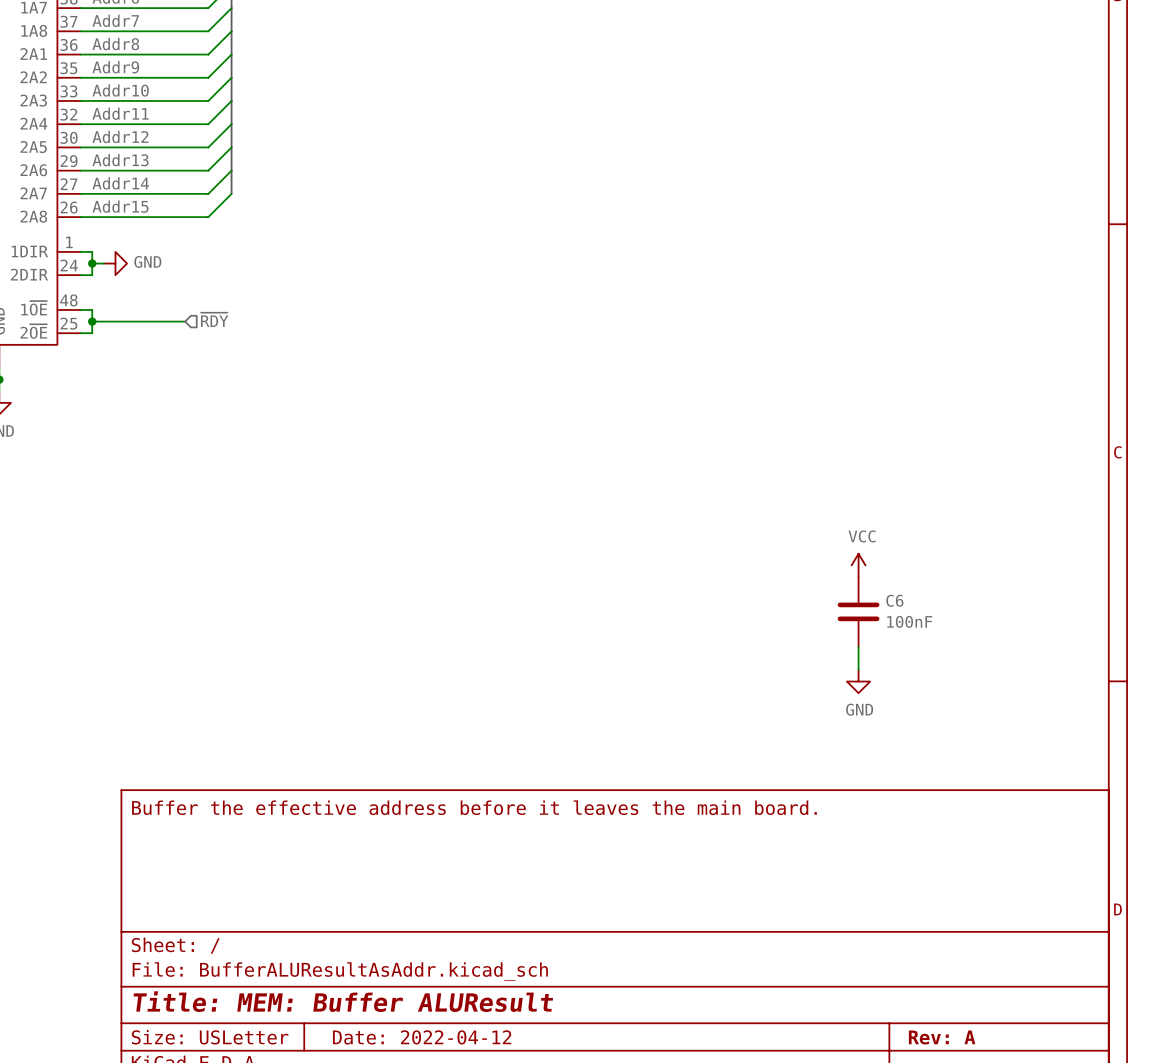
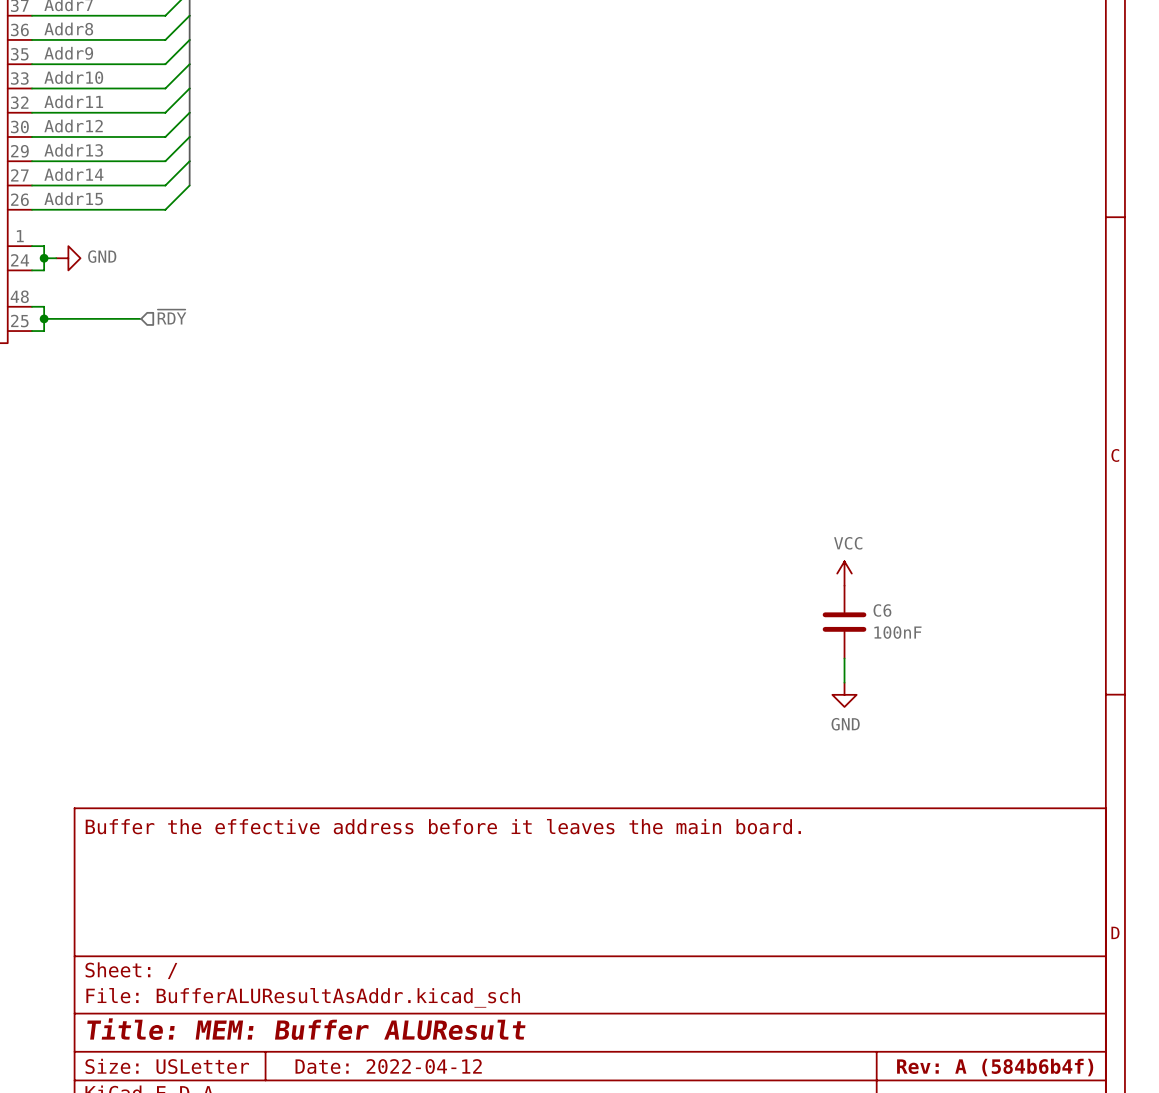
title block: Rev: A (942, 1037) -> Rev: A (584b6b4f) (995, 1067)

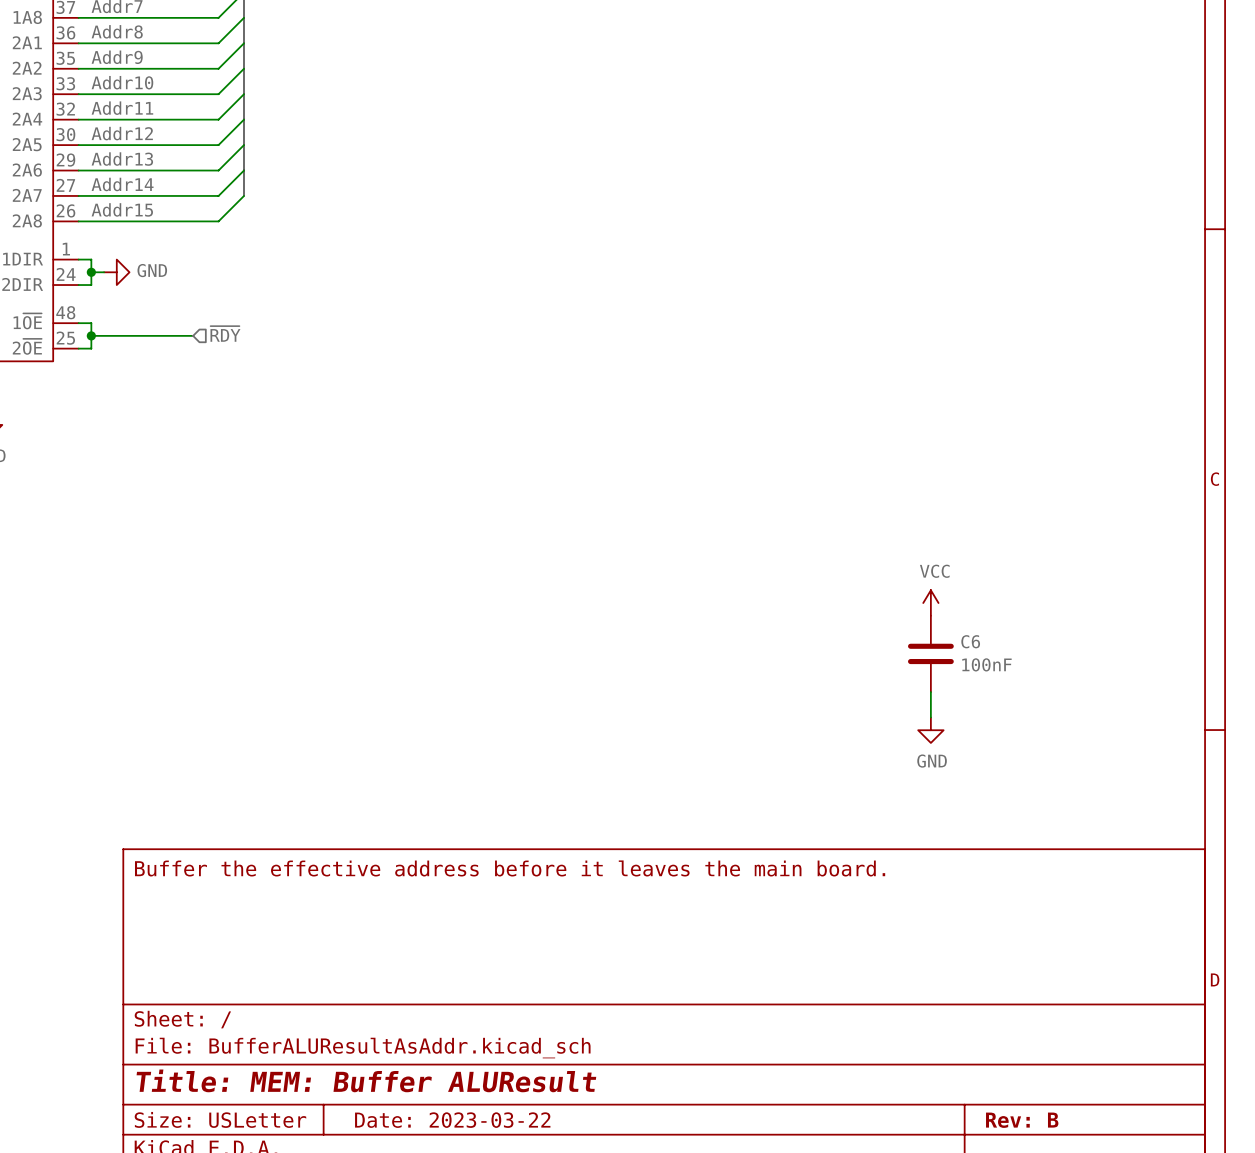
title block: Date: 2022-04-12 (388, 1066) -> Date: 2023-03-22 (452, 1120)
title block: Rev: A (584b6b4f) (995, 1067) -> Rev: B (1022, 1120)

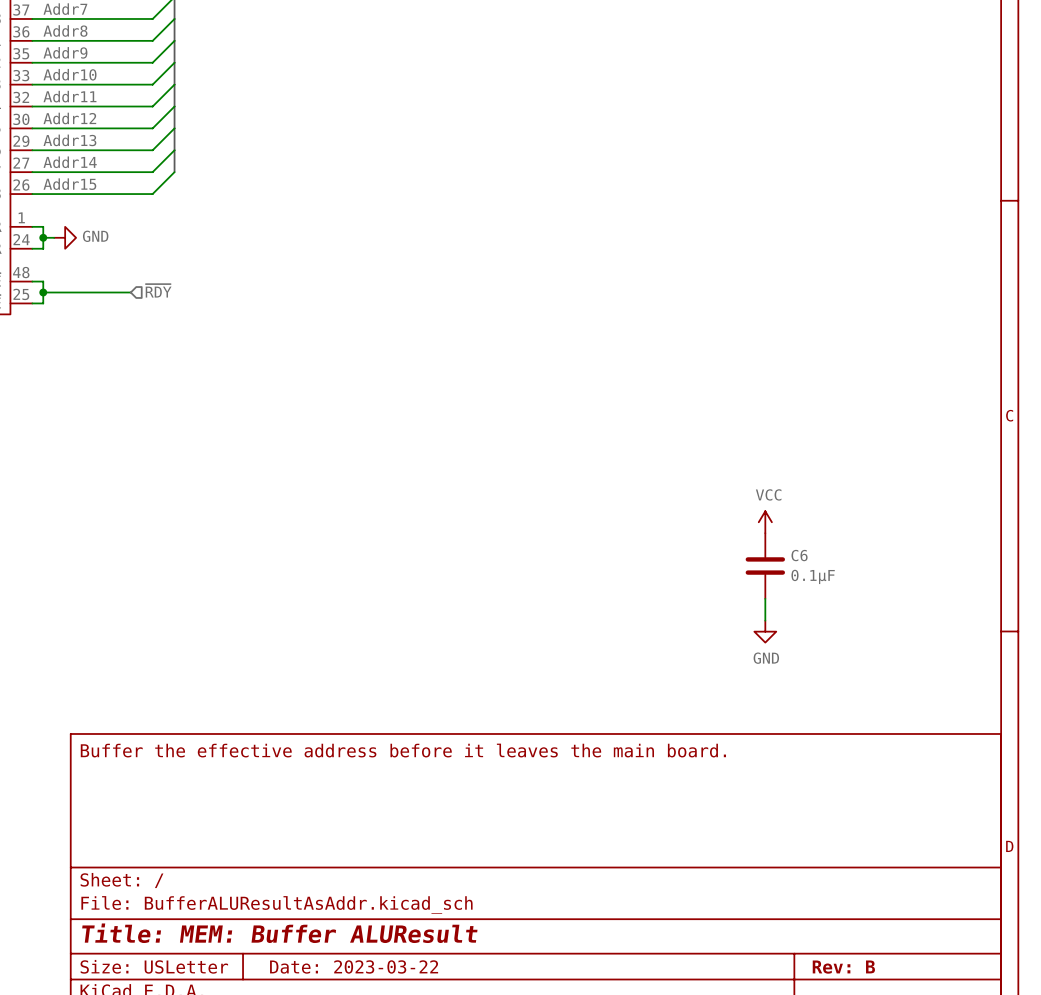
C6 value: 100nF (986, 664) -> 0.1μF (813, 576)

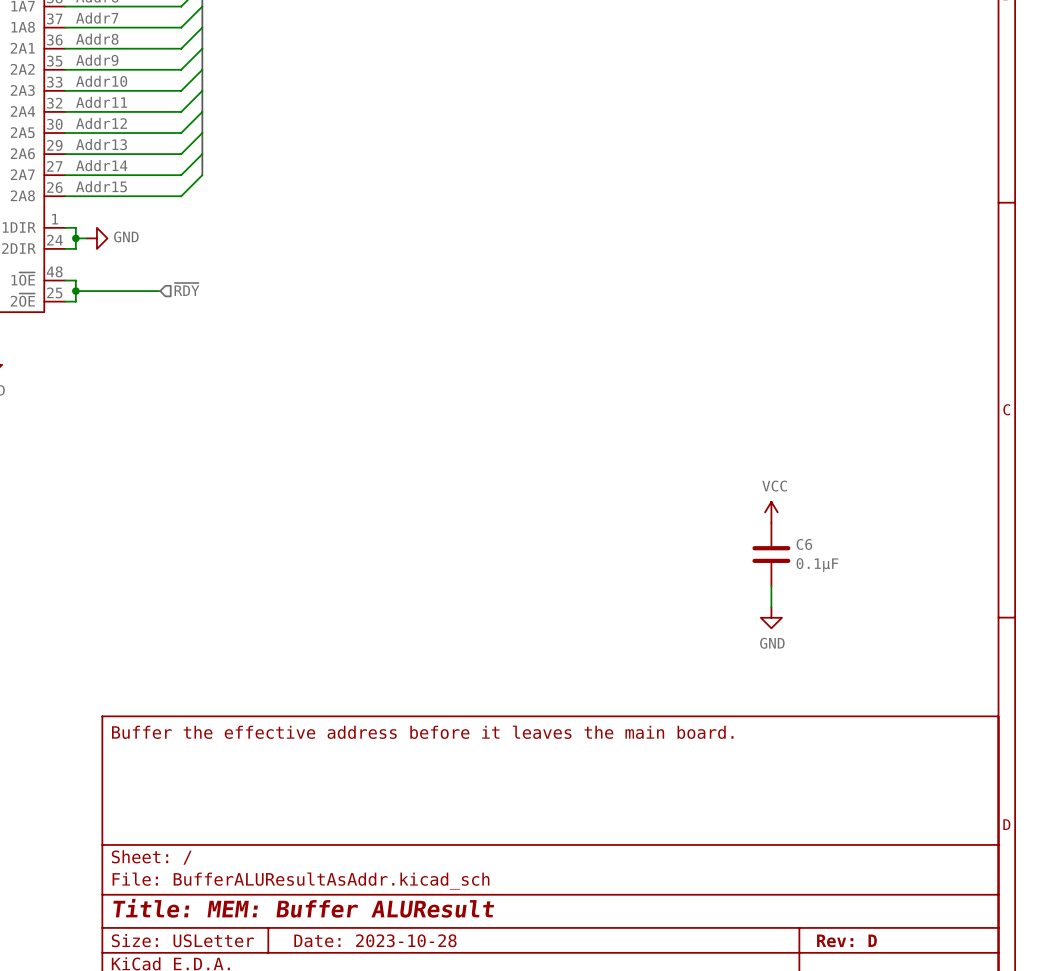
title block: Date: 2023-03-22 (354, 966) -> Date: 2023-10-28 (375, 940)
title block: Rev: B (843, 967) -> Rev: D (846, 940)

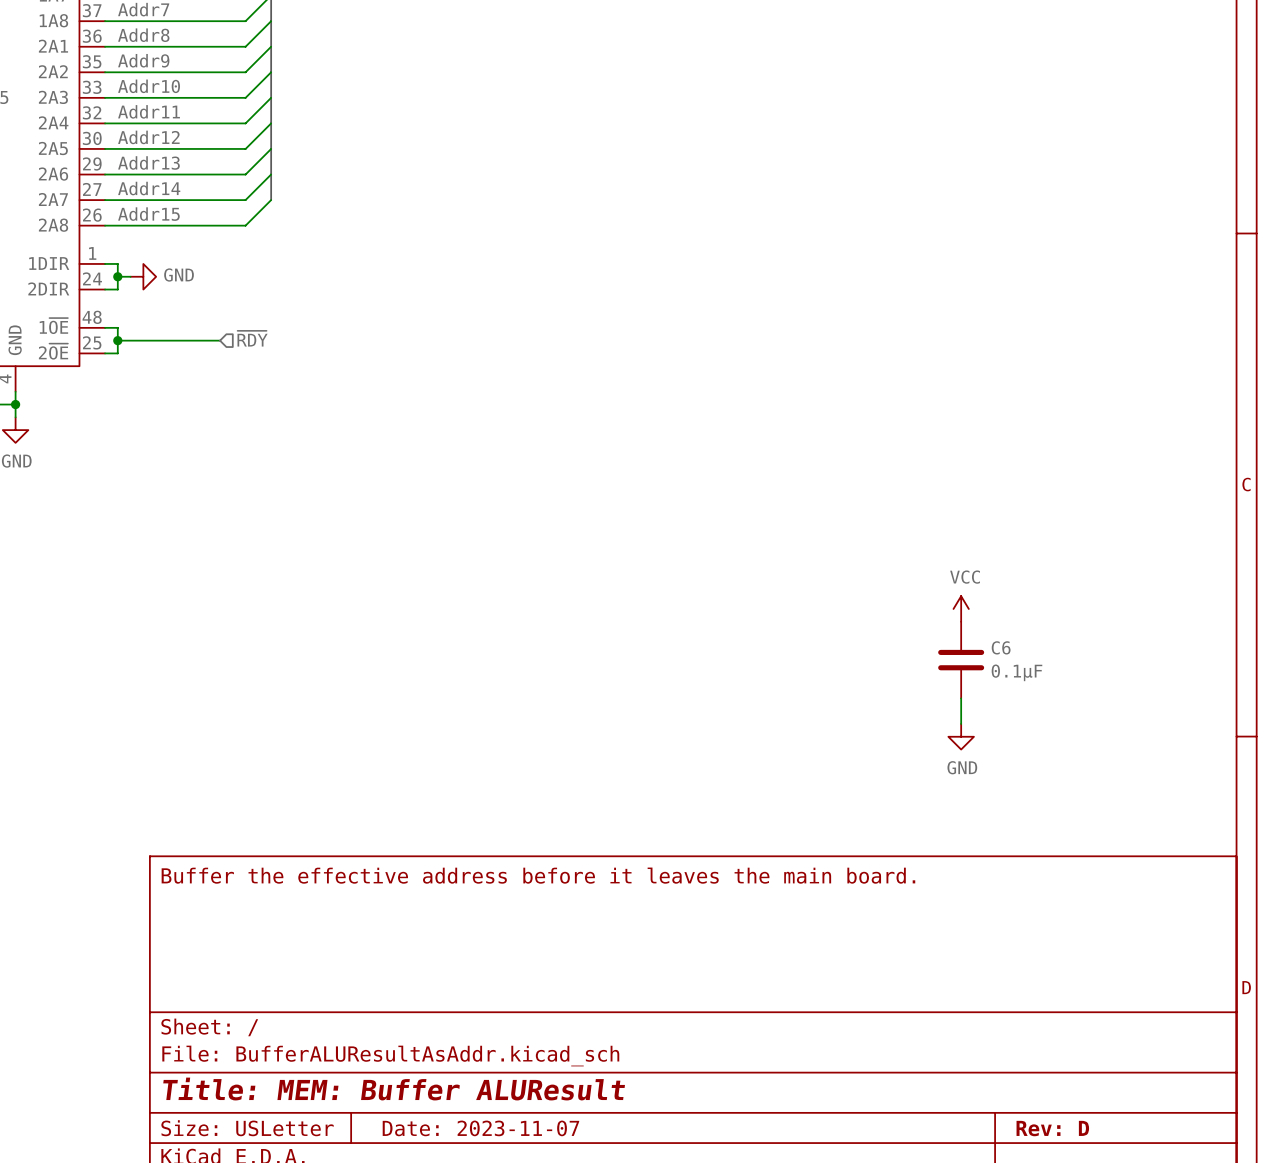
title block: Date: 2023-10-28 (375, 940) -> Date: 2023-11-07 (480, 1128)

